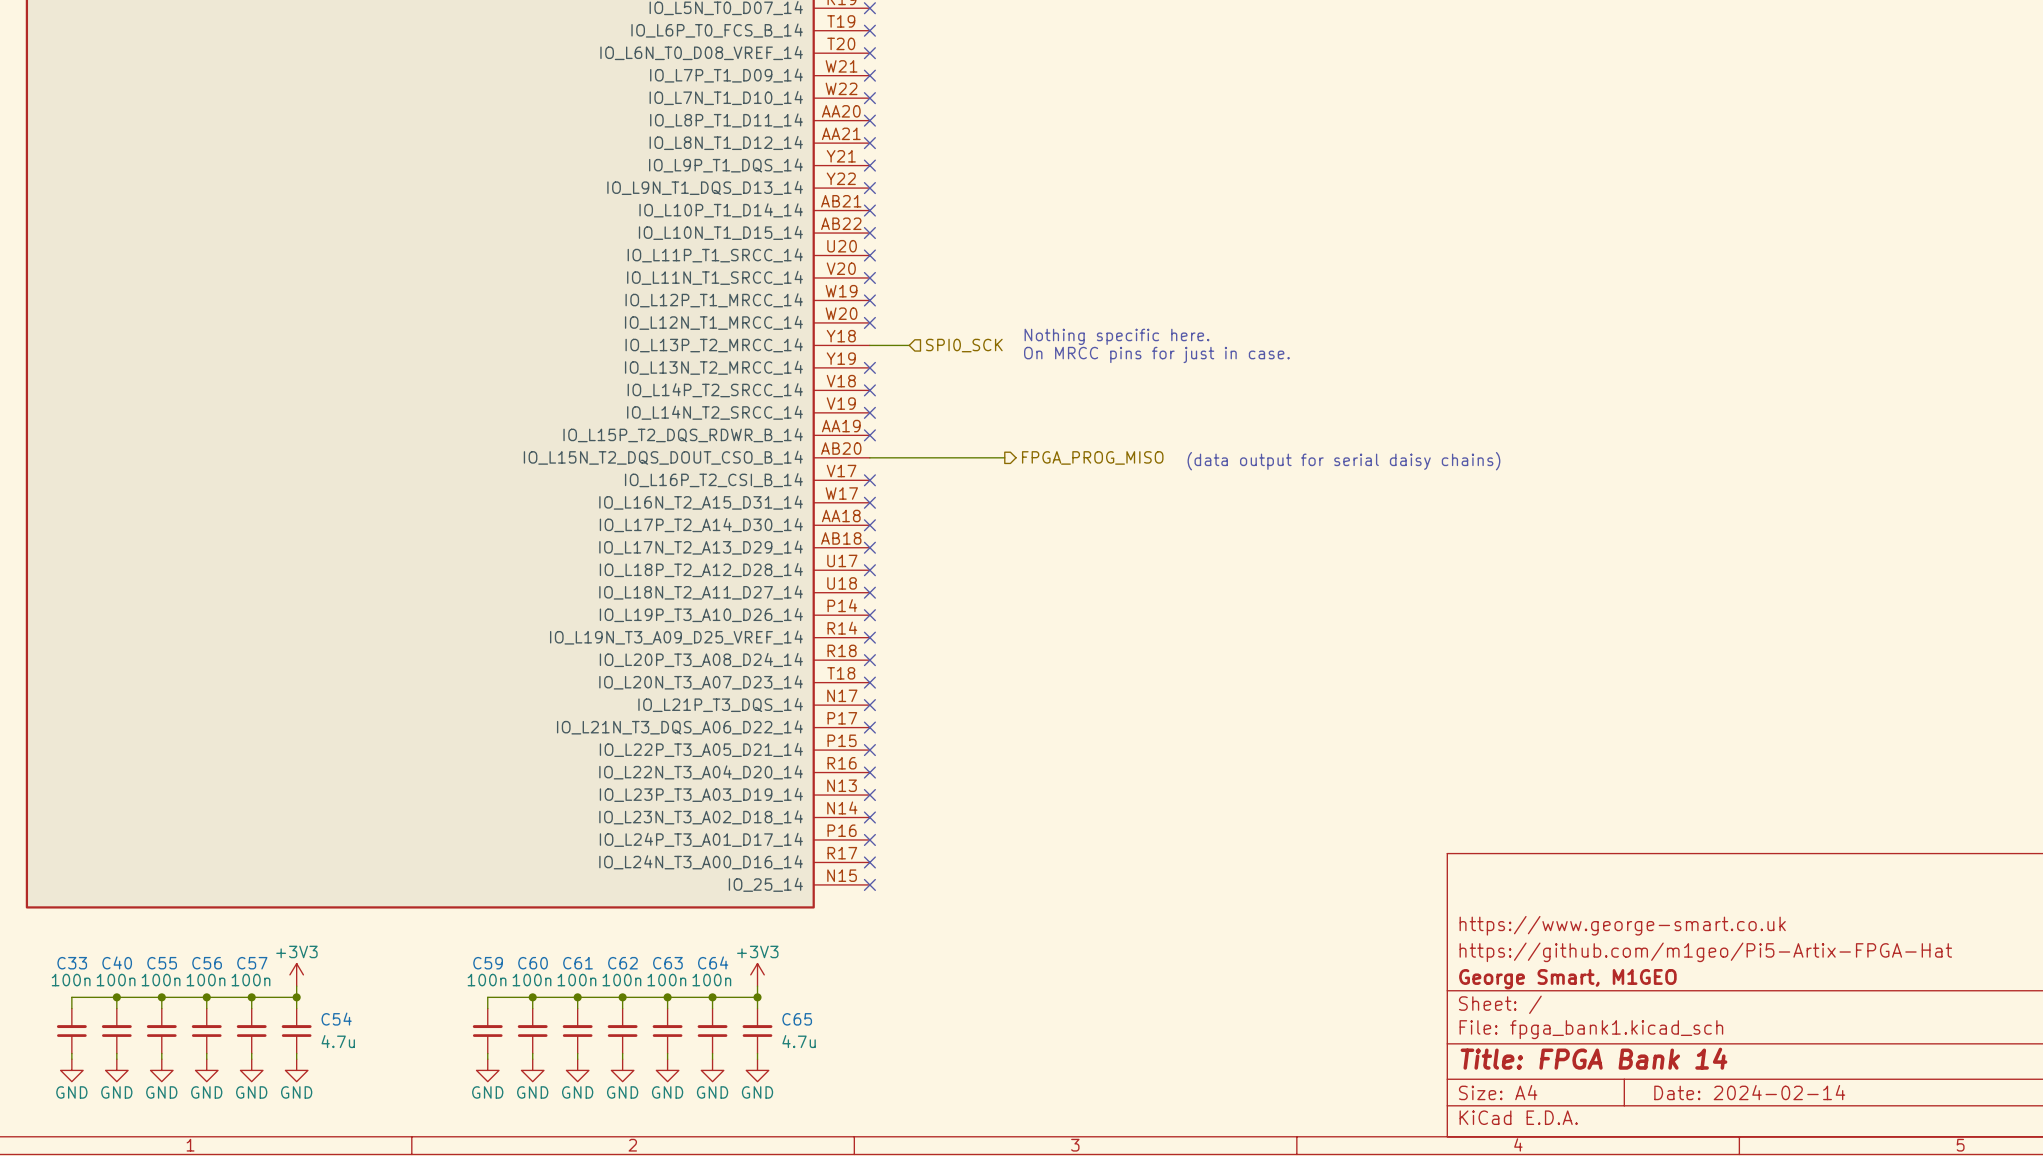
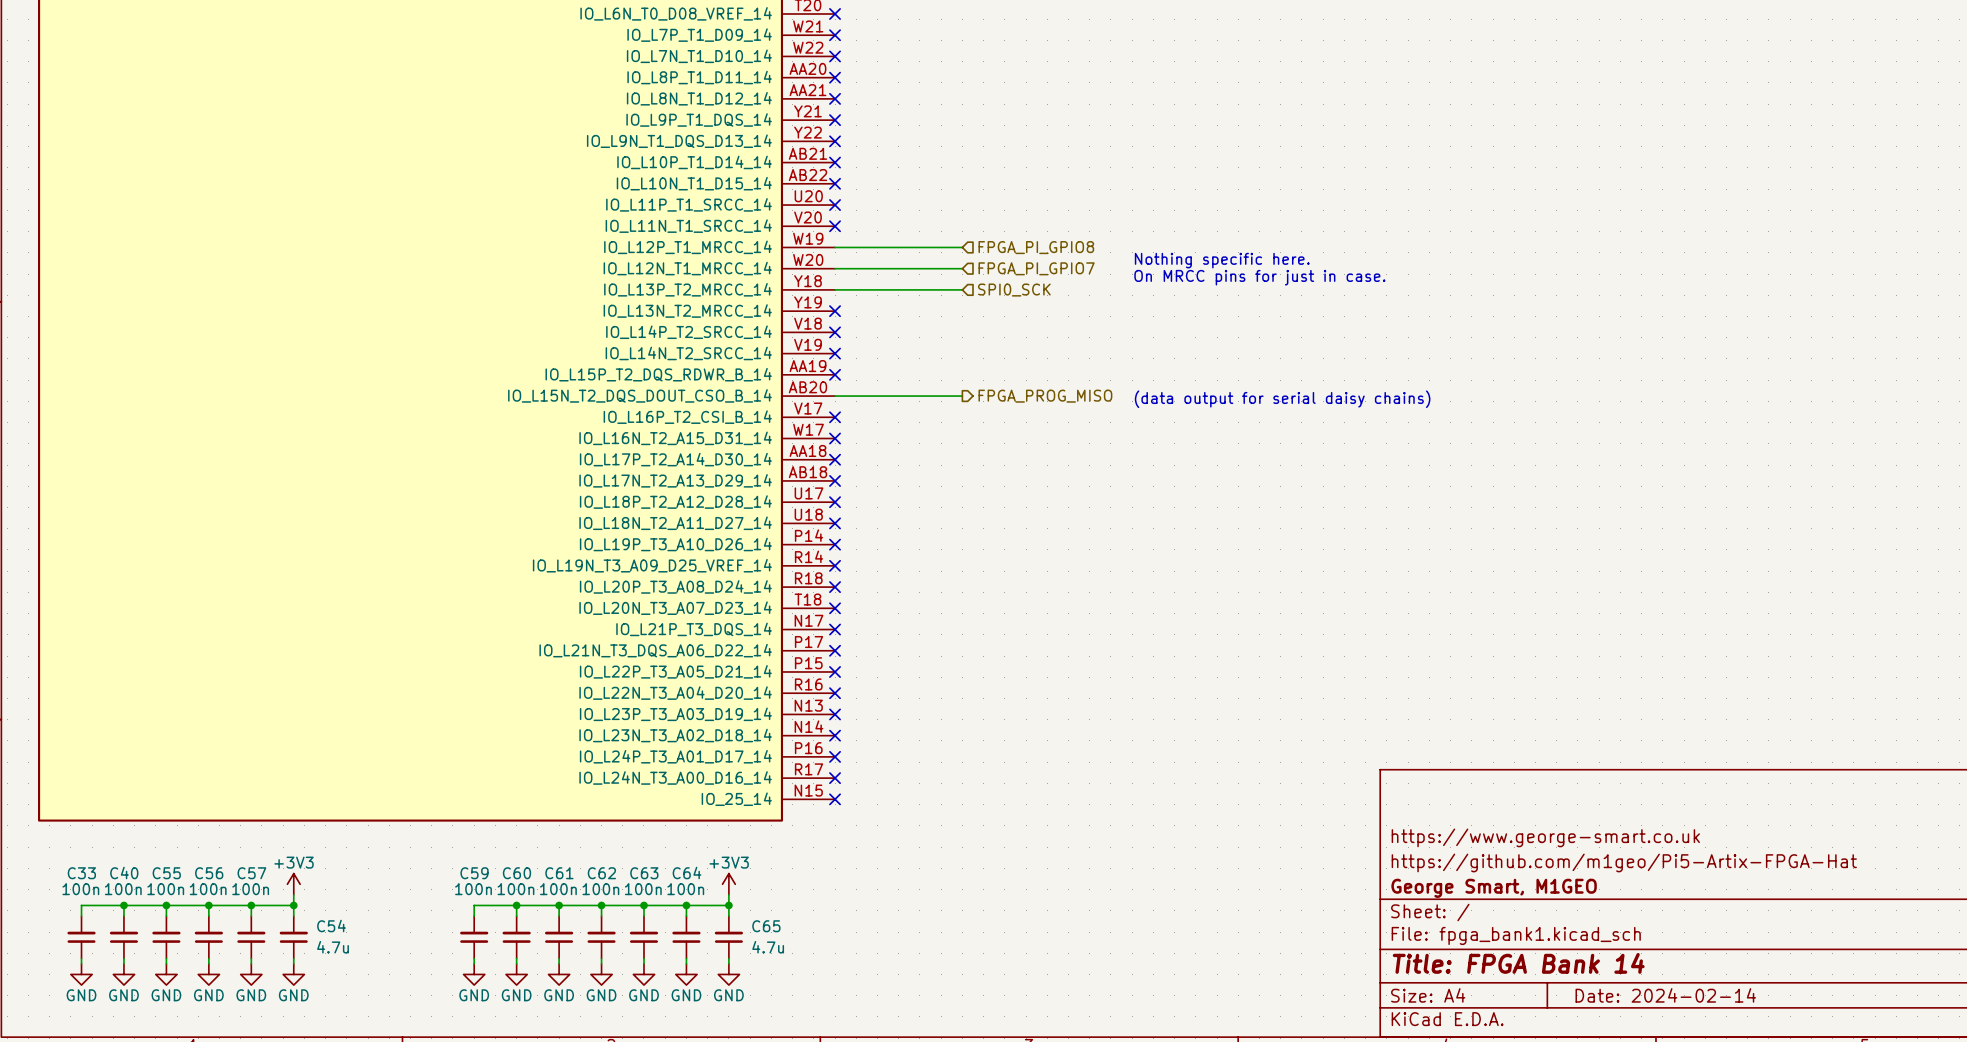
wire: none -> (835, 247) (962, 247)
no-connect mark: (869, 300) -> none
hierarchical label: none -> FPGA_PI_GPIO8 (1036, 247)
wire: none -> (835, 268) (962, 268)
no-connect mark: (869, 322) -> none
hierarchical label: none -> FPGA_PI_GPIO7 (1036, 268)
text position: Nothing specific here. (1117, 336) -> Nothing specific here. (1222, 260)
wire: none -> (872, 289) (962, 289)
hierarchical label position: SPI0_SCK (964, 345) -> SPI0_SCK (1014, 290)
text position: On MRCC pins for just in case. (1156, 354) -> On MRCC pins for just in case. (1259, 277)

